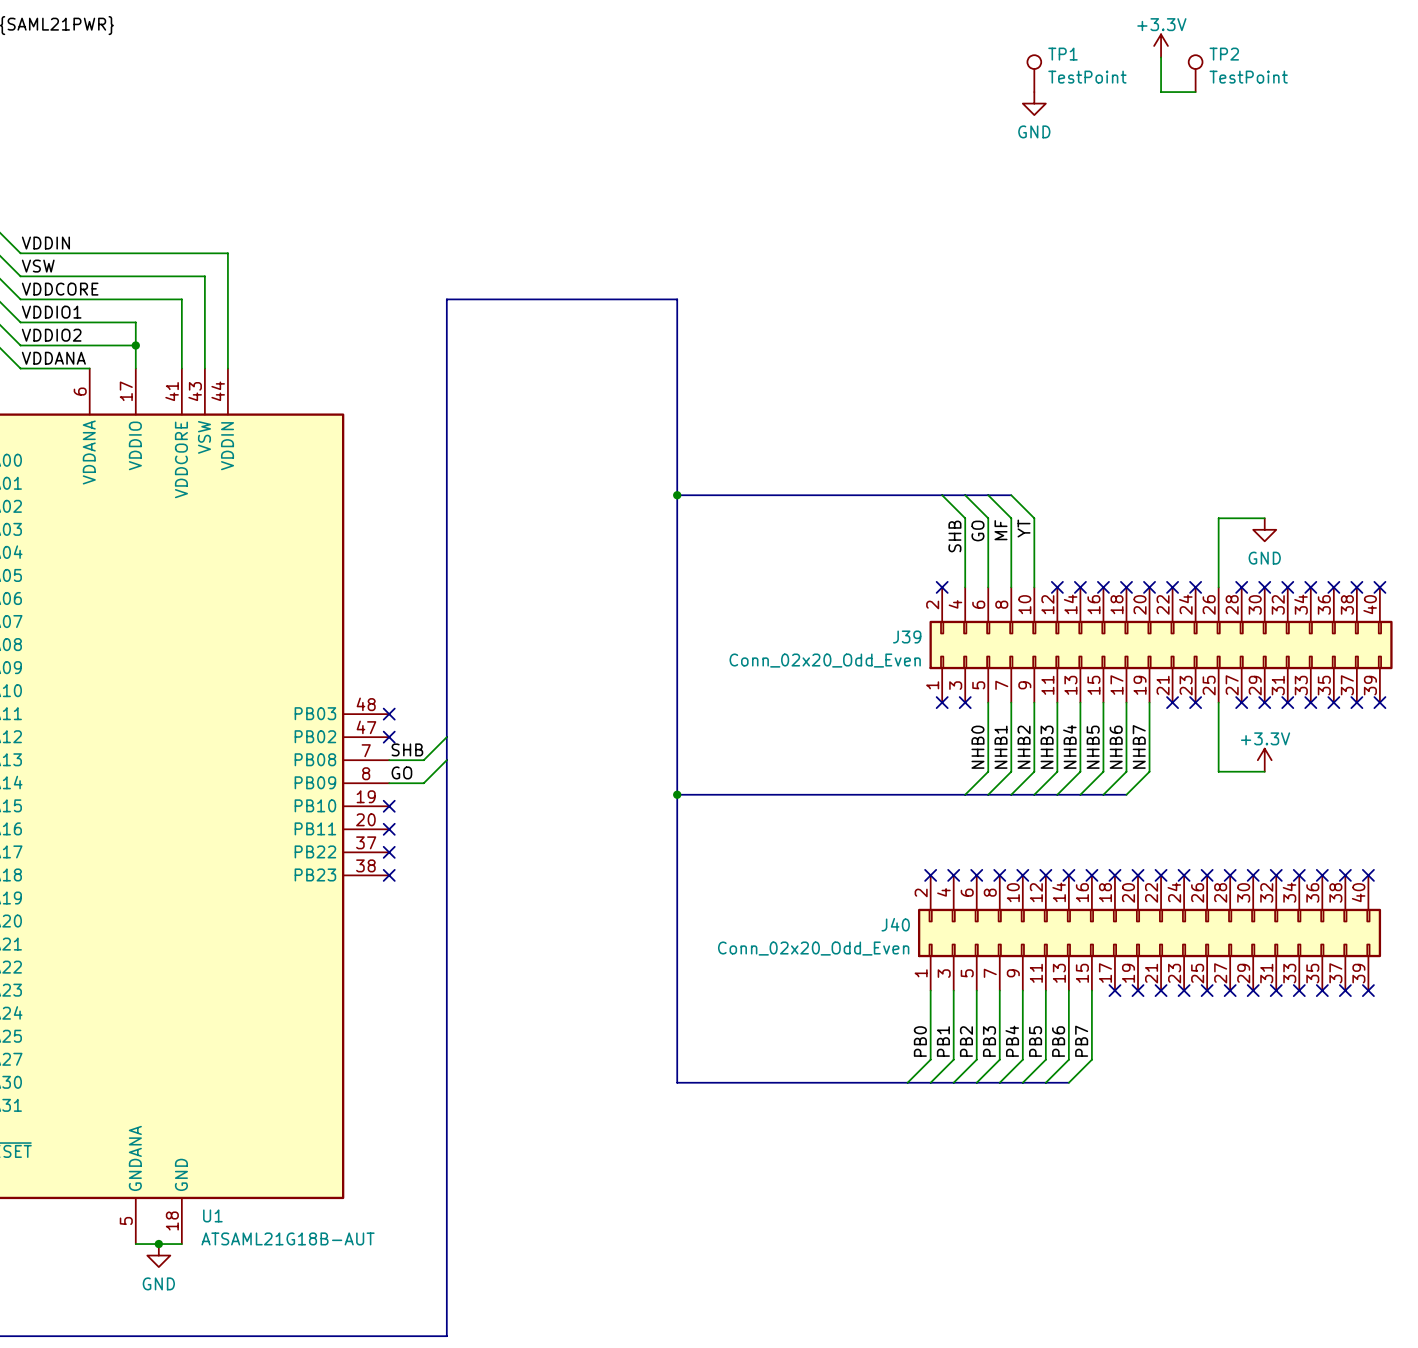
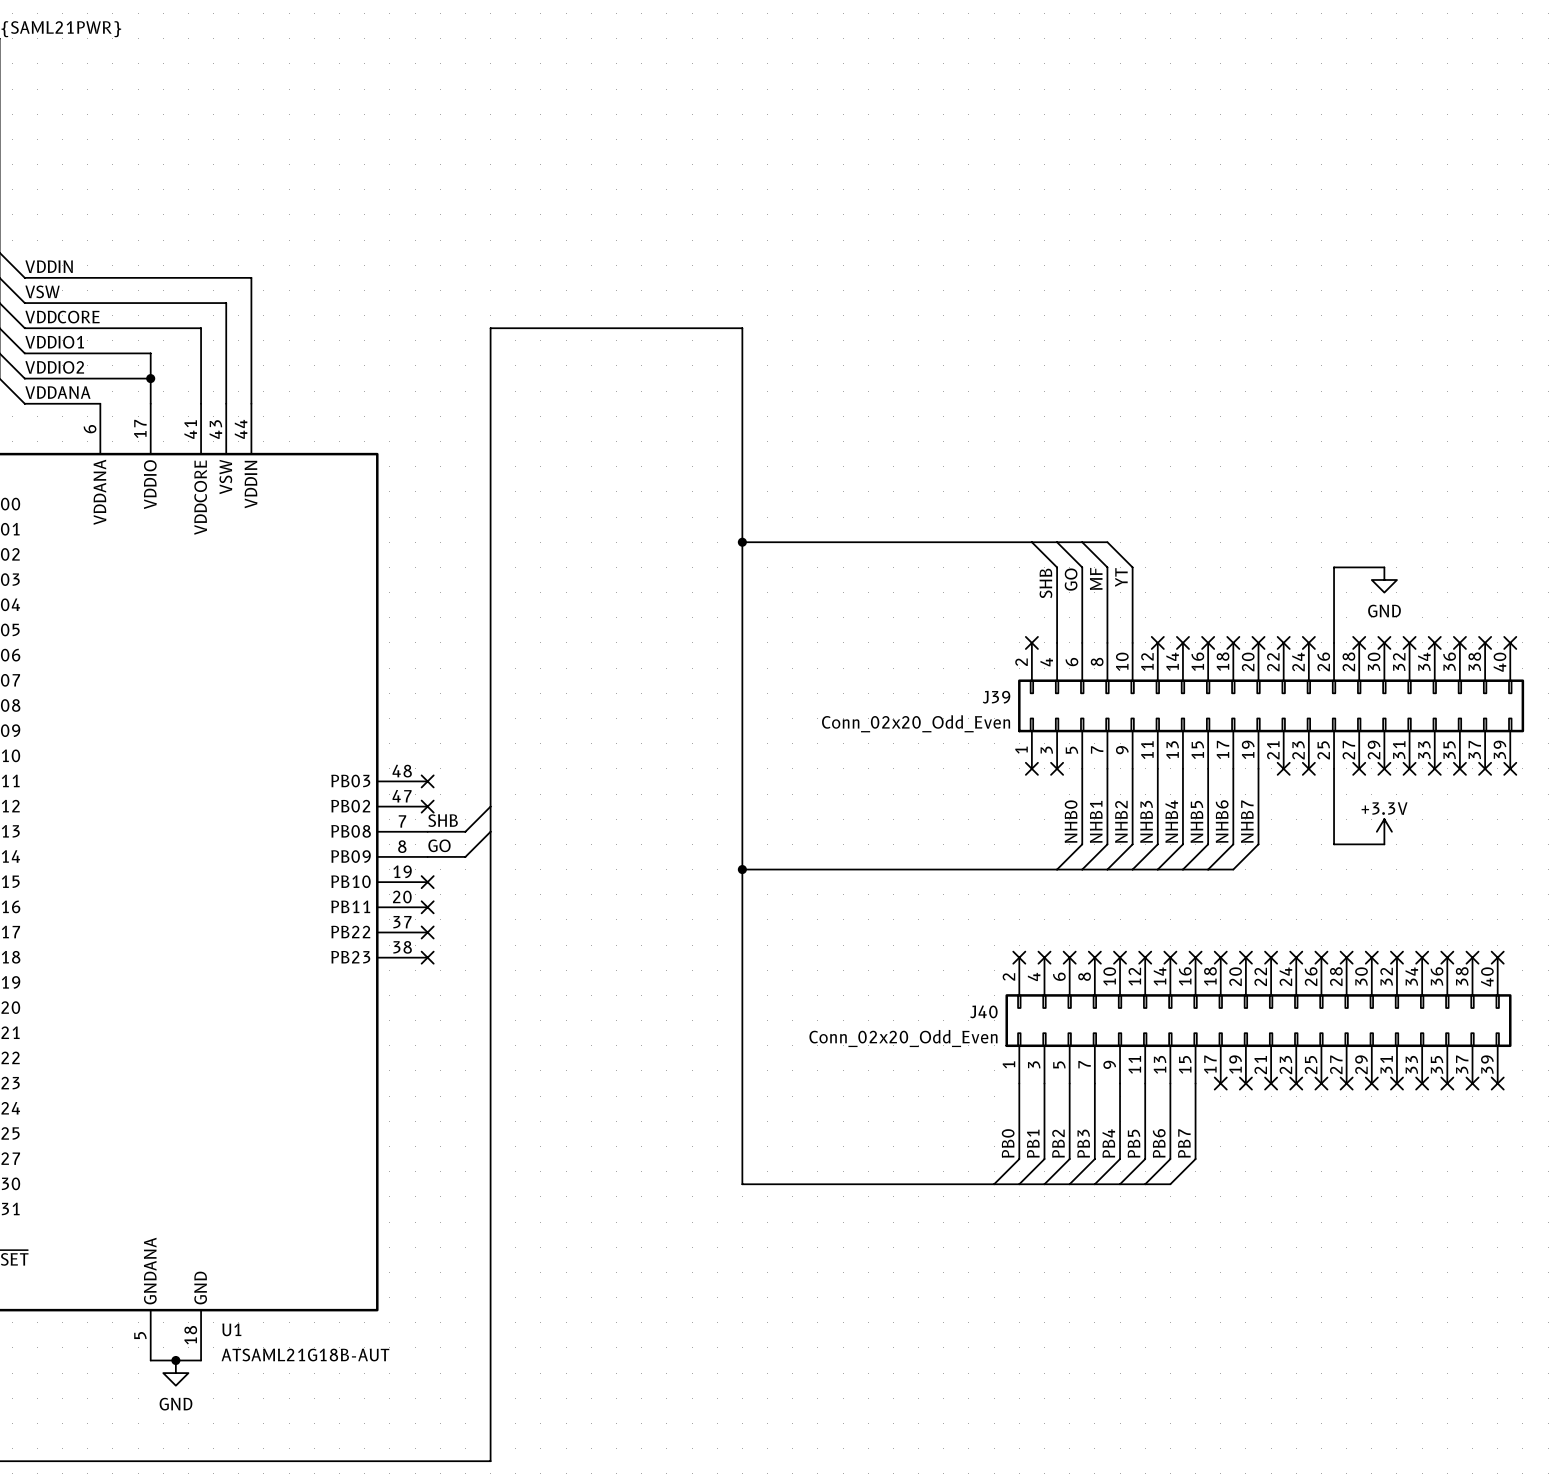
power symbol: +3.3V (1161, 45) -> none
wire: (1161, 57) (1161, 92) (1195, 92) -> none
TP1: TestPoint (1034, 73) -> none
TP2: TestPoint (1195, 73) -> none
power symbol: GND (1034, 103) -> none

